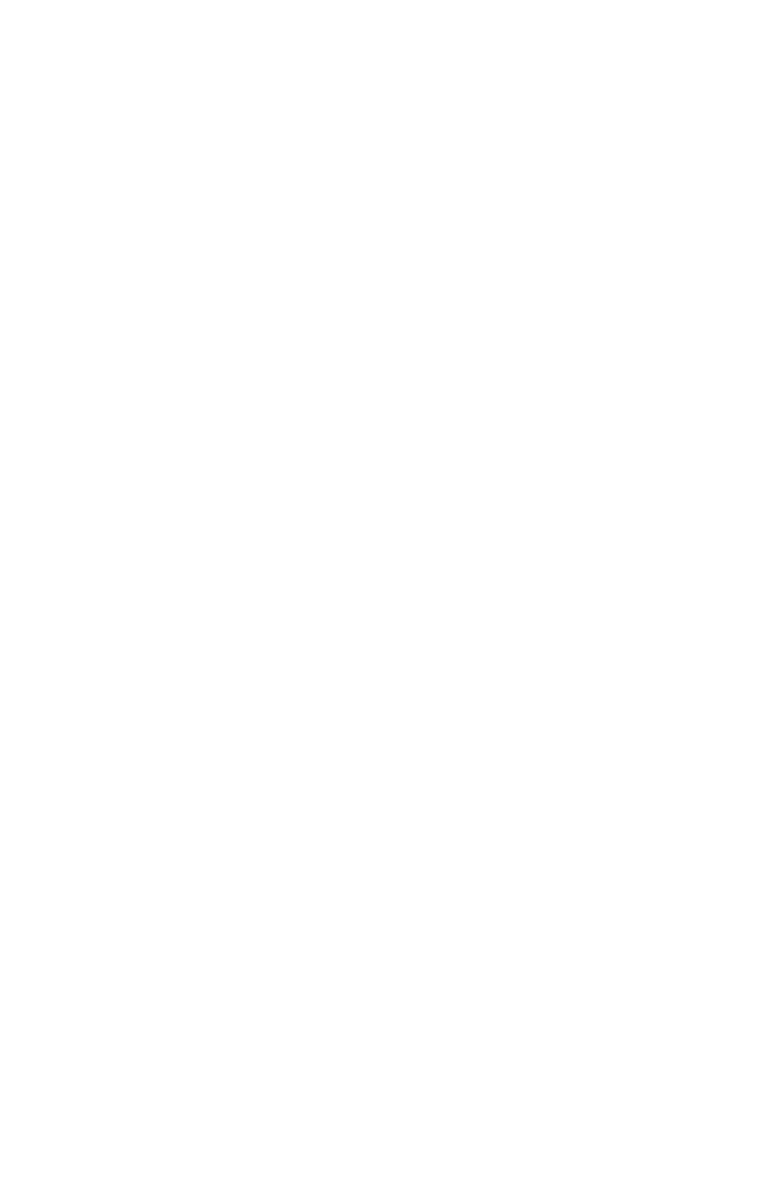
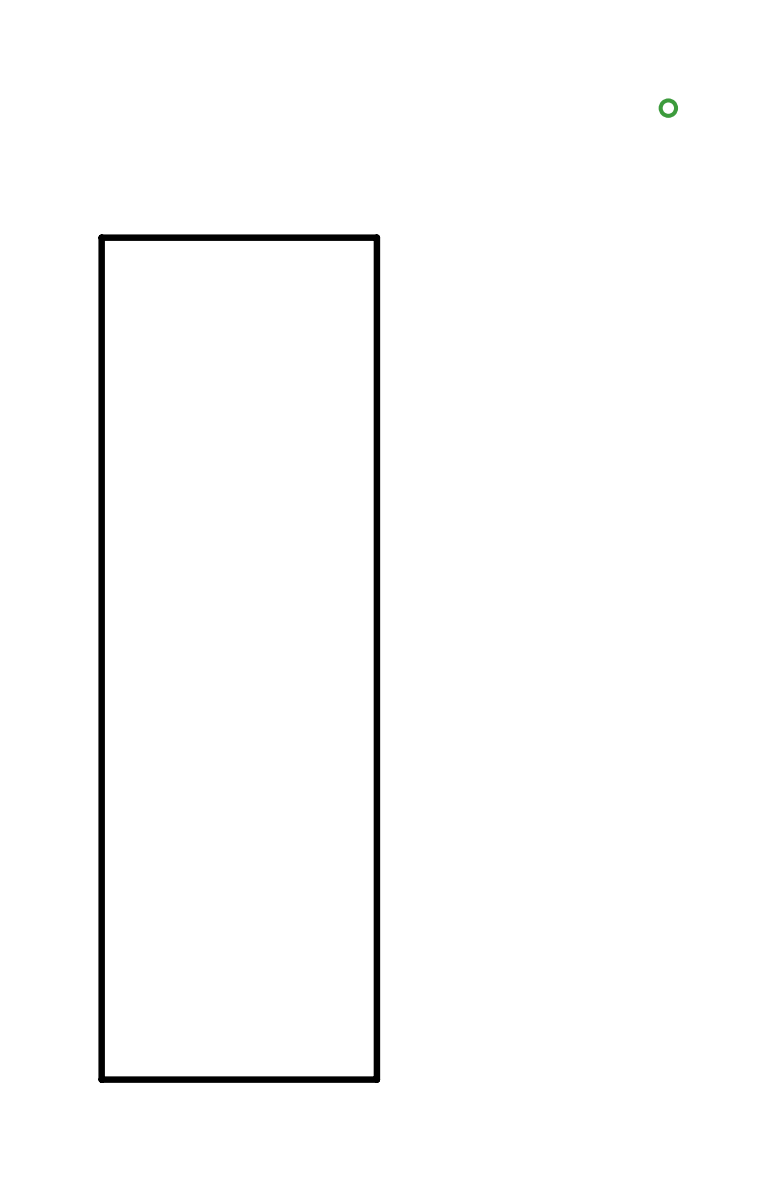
via: none -> (668, 108)
board edge: none -> (376, 237) (101, 237) (101, 1079) (376, 1079) (376, 237)

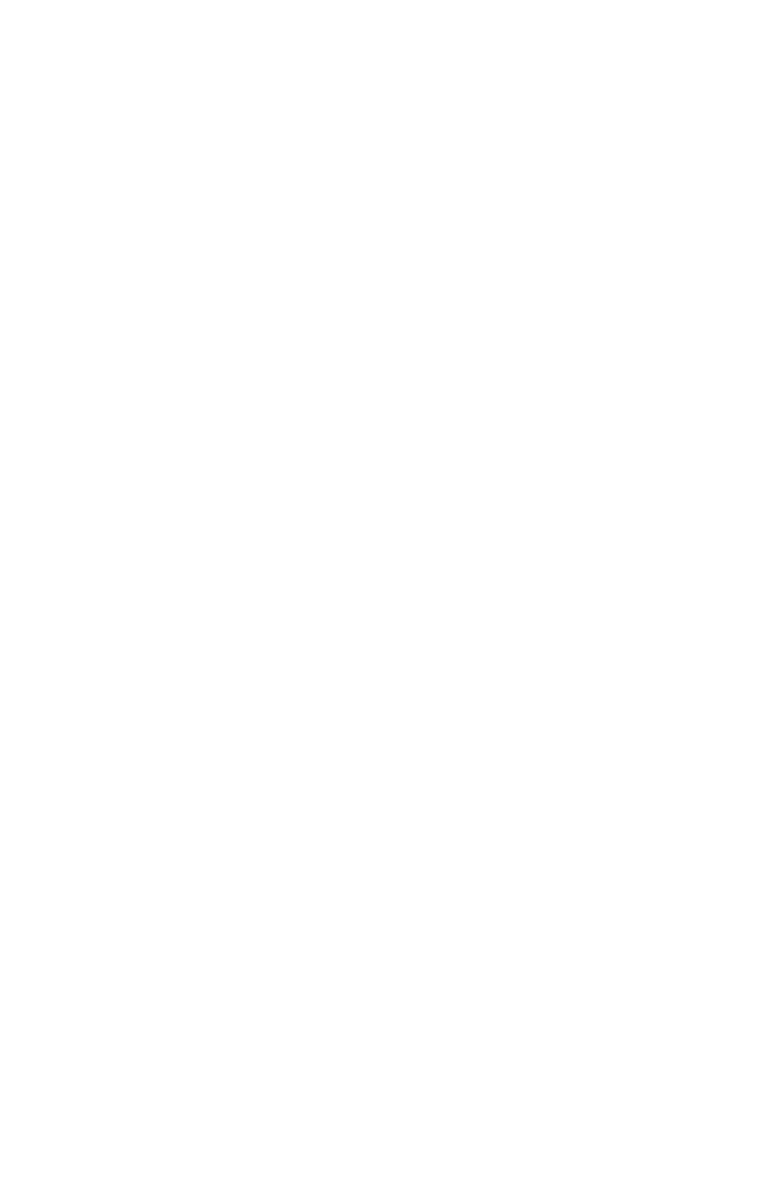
via: (668, 108) -> none
board edge: (376, 237) (101, 237) (101, 1079) (376, 1079) (376, 237) -> none

